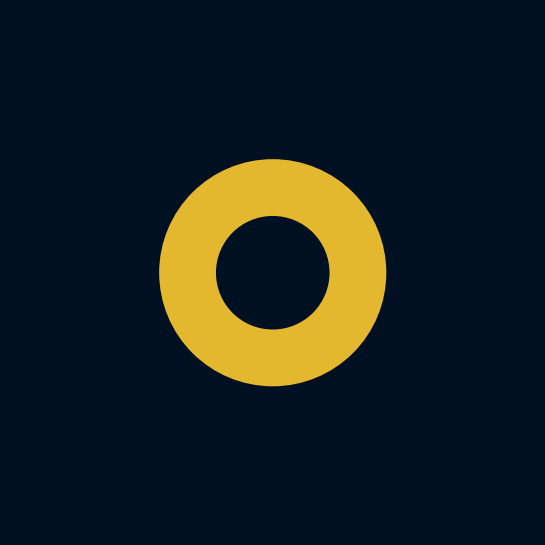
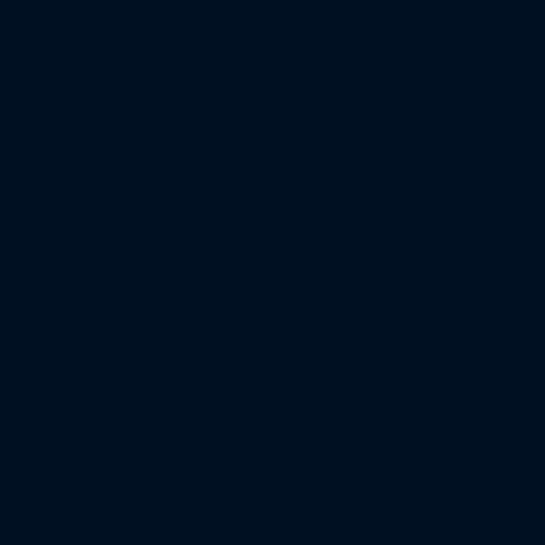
part: (272, 272) -> none

